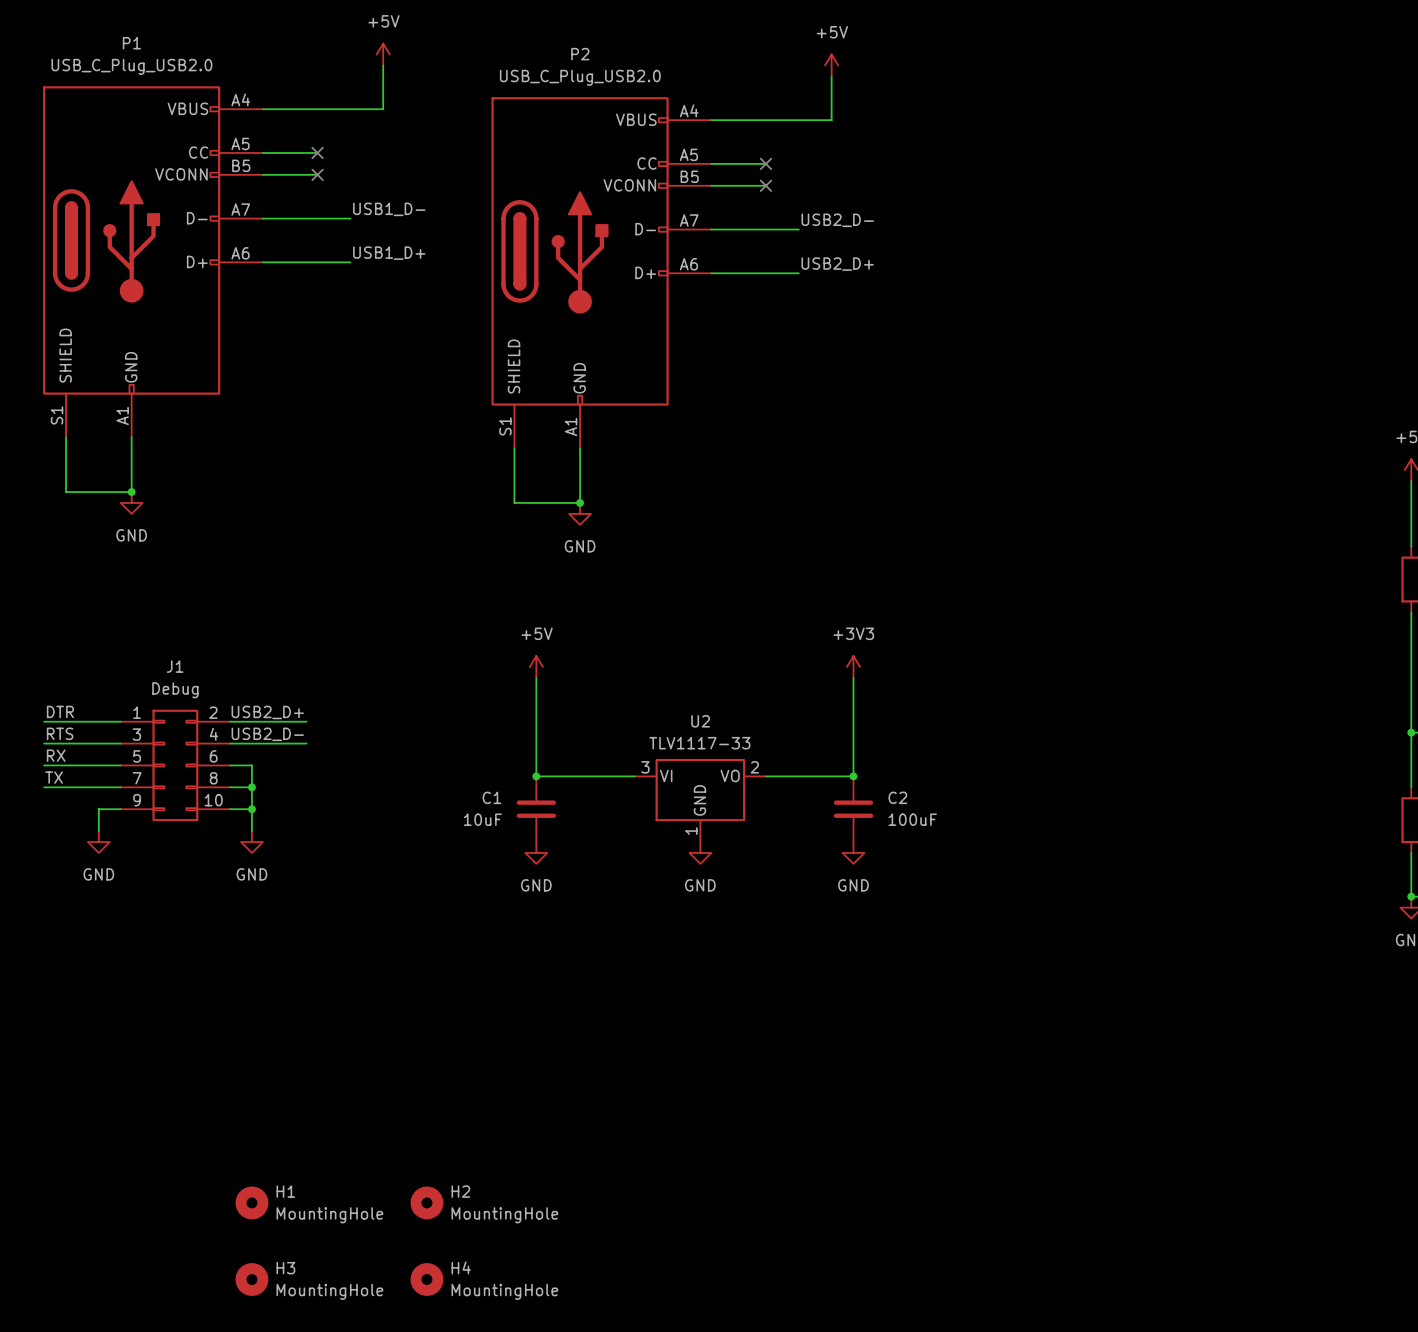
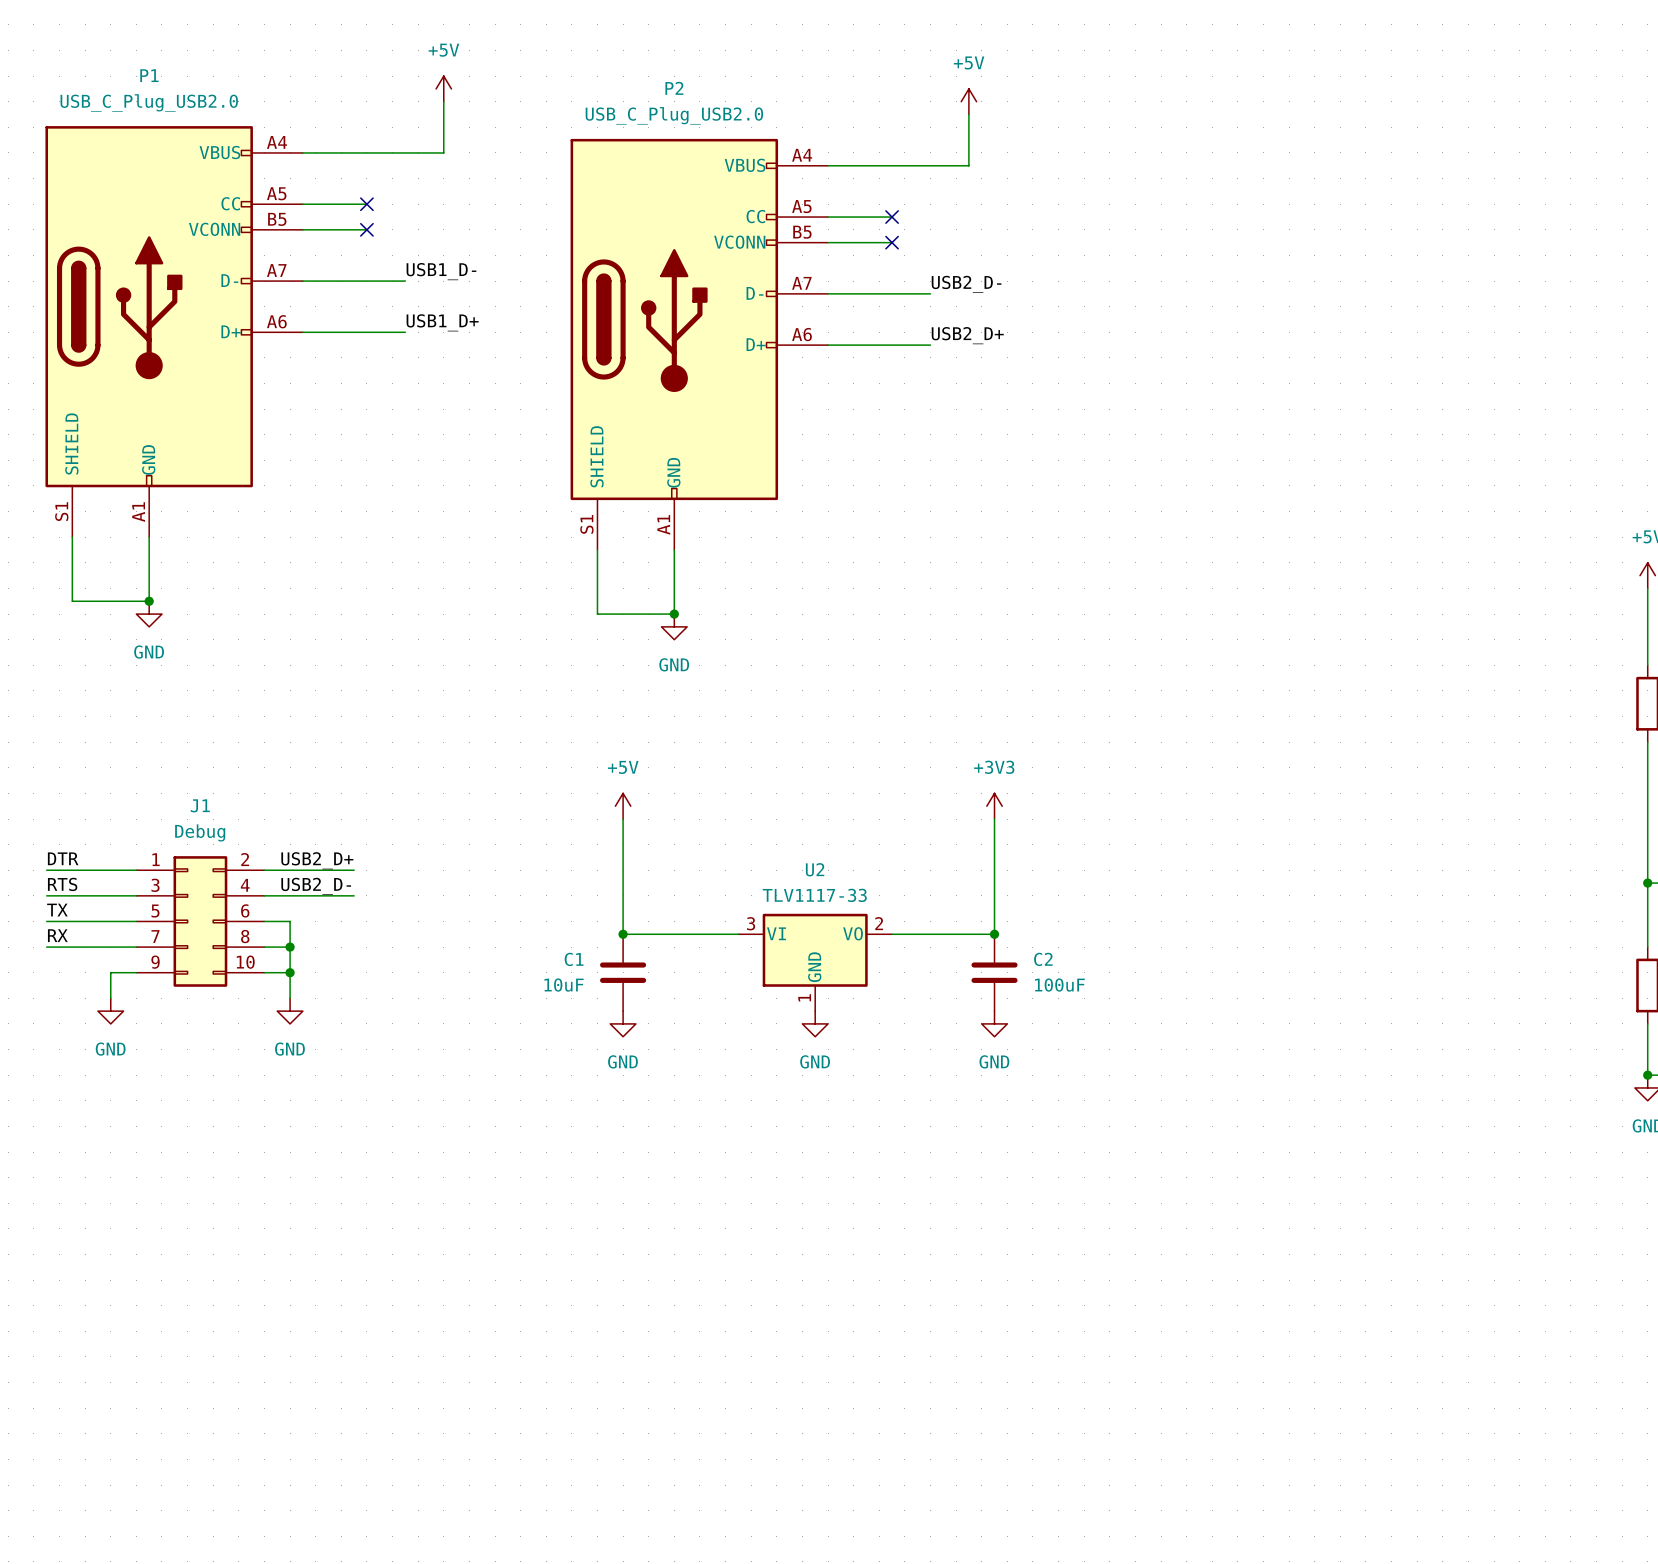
label: RX (56, 755) -> TX (57, 910)
label: TX (54, 777) -> RX (57, 935)
H1: MountingHole (251, 1202) -> none
H2: MountingHole (426, 1202) -> none
H3: MountingHole (251, 1279) -> none
H4: MountingHole (426, 1279) -> none

